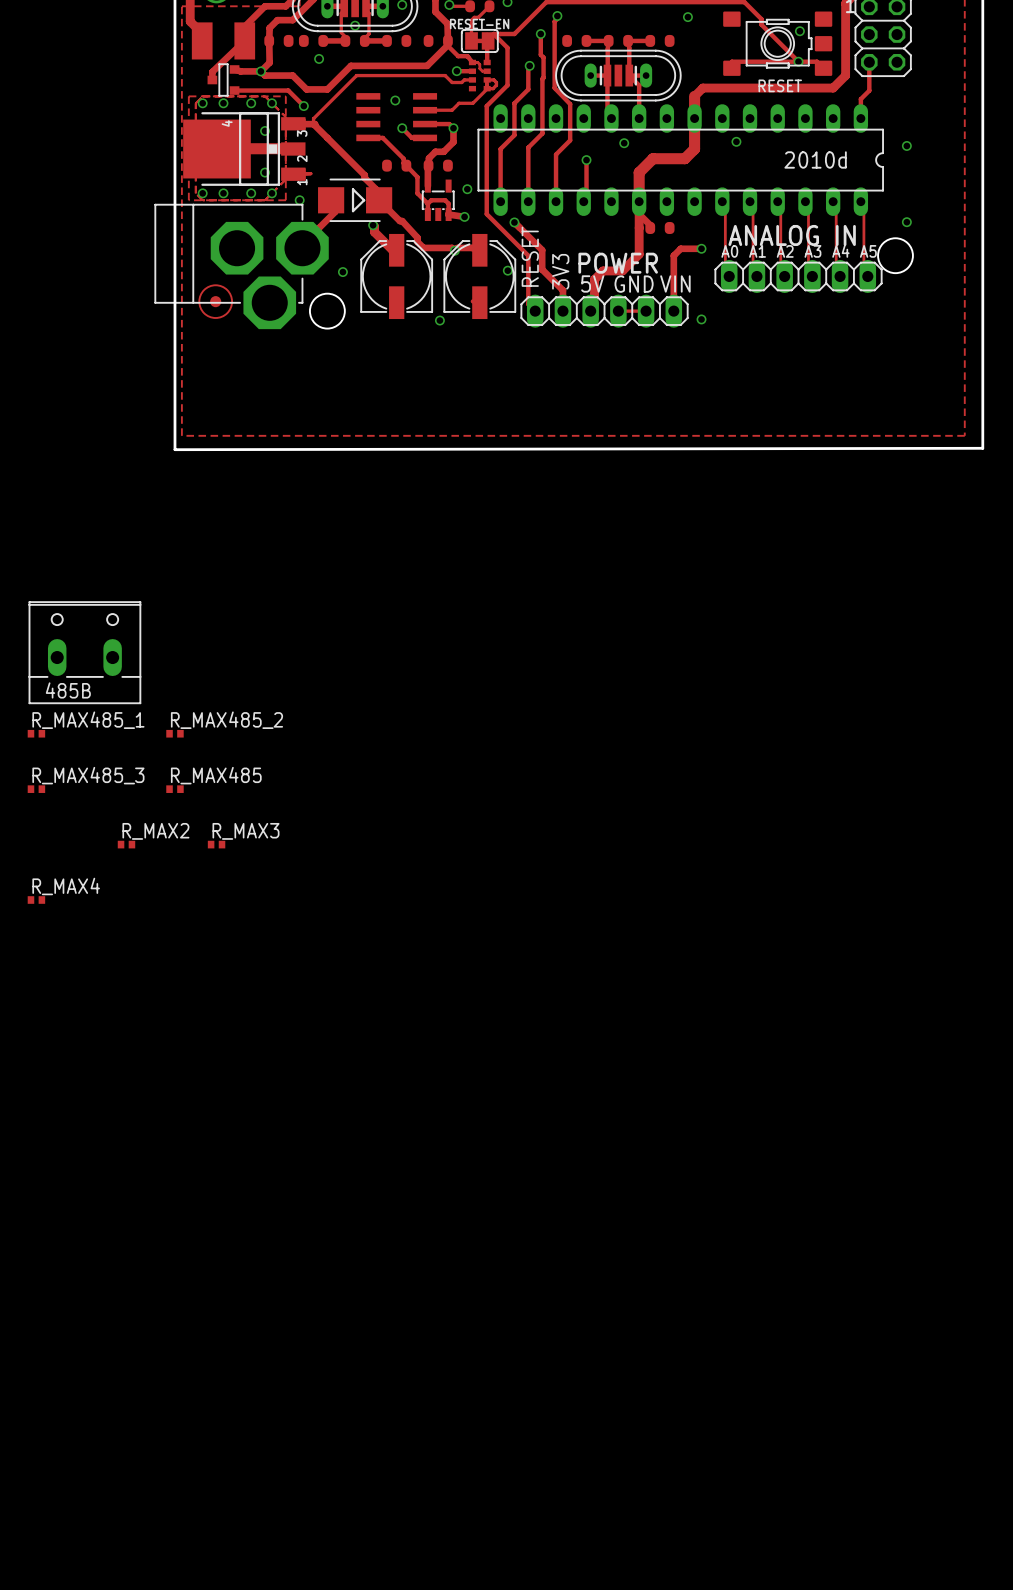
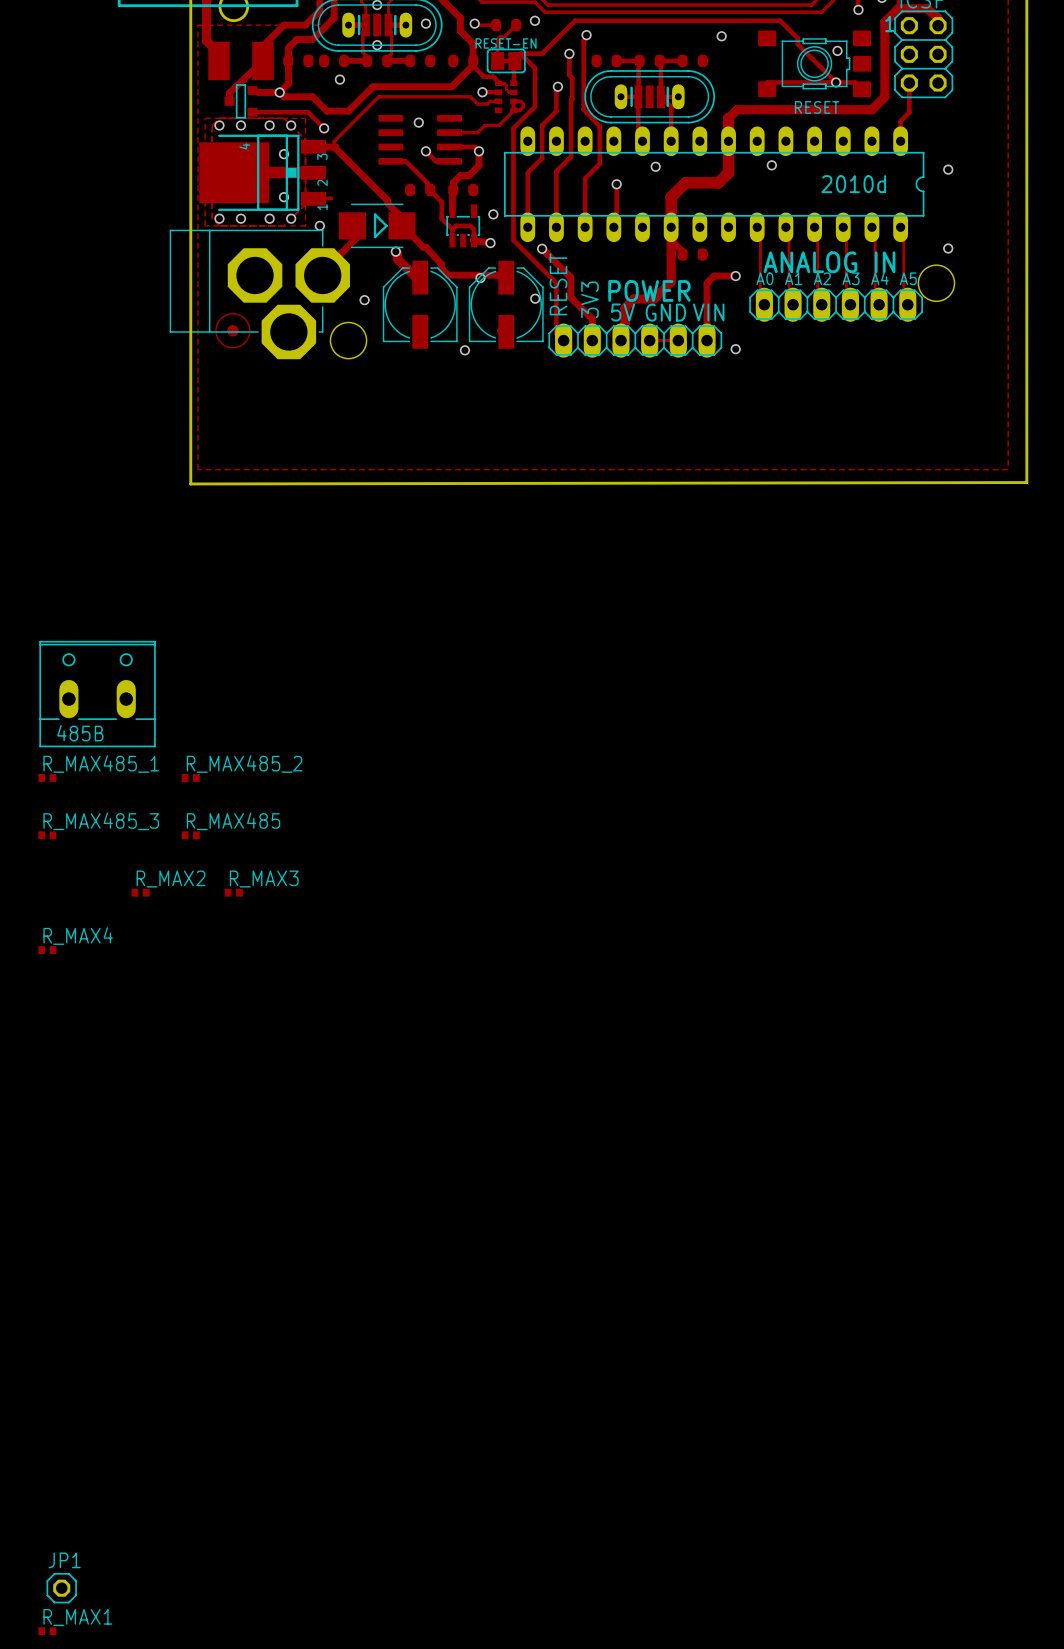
JP1: none -> (61, 1588)
R_MAX1: none -> (47, 1631)

